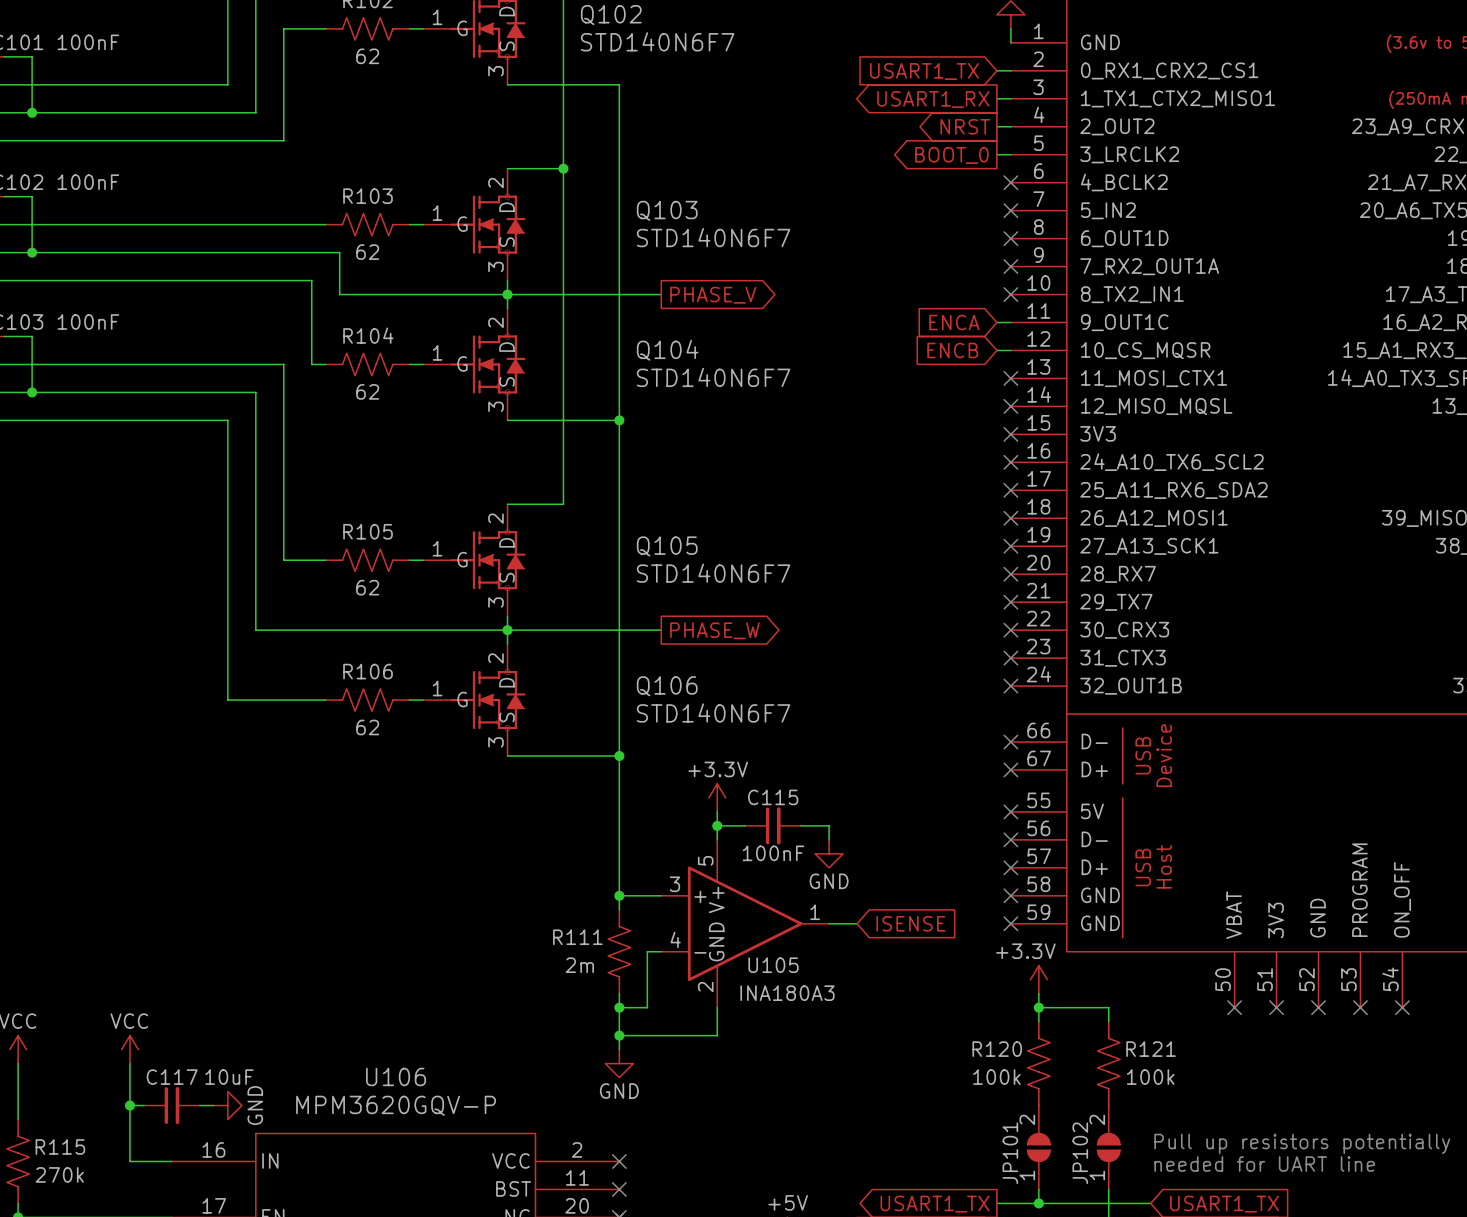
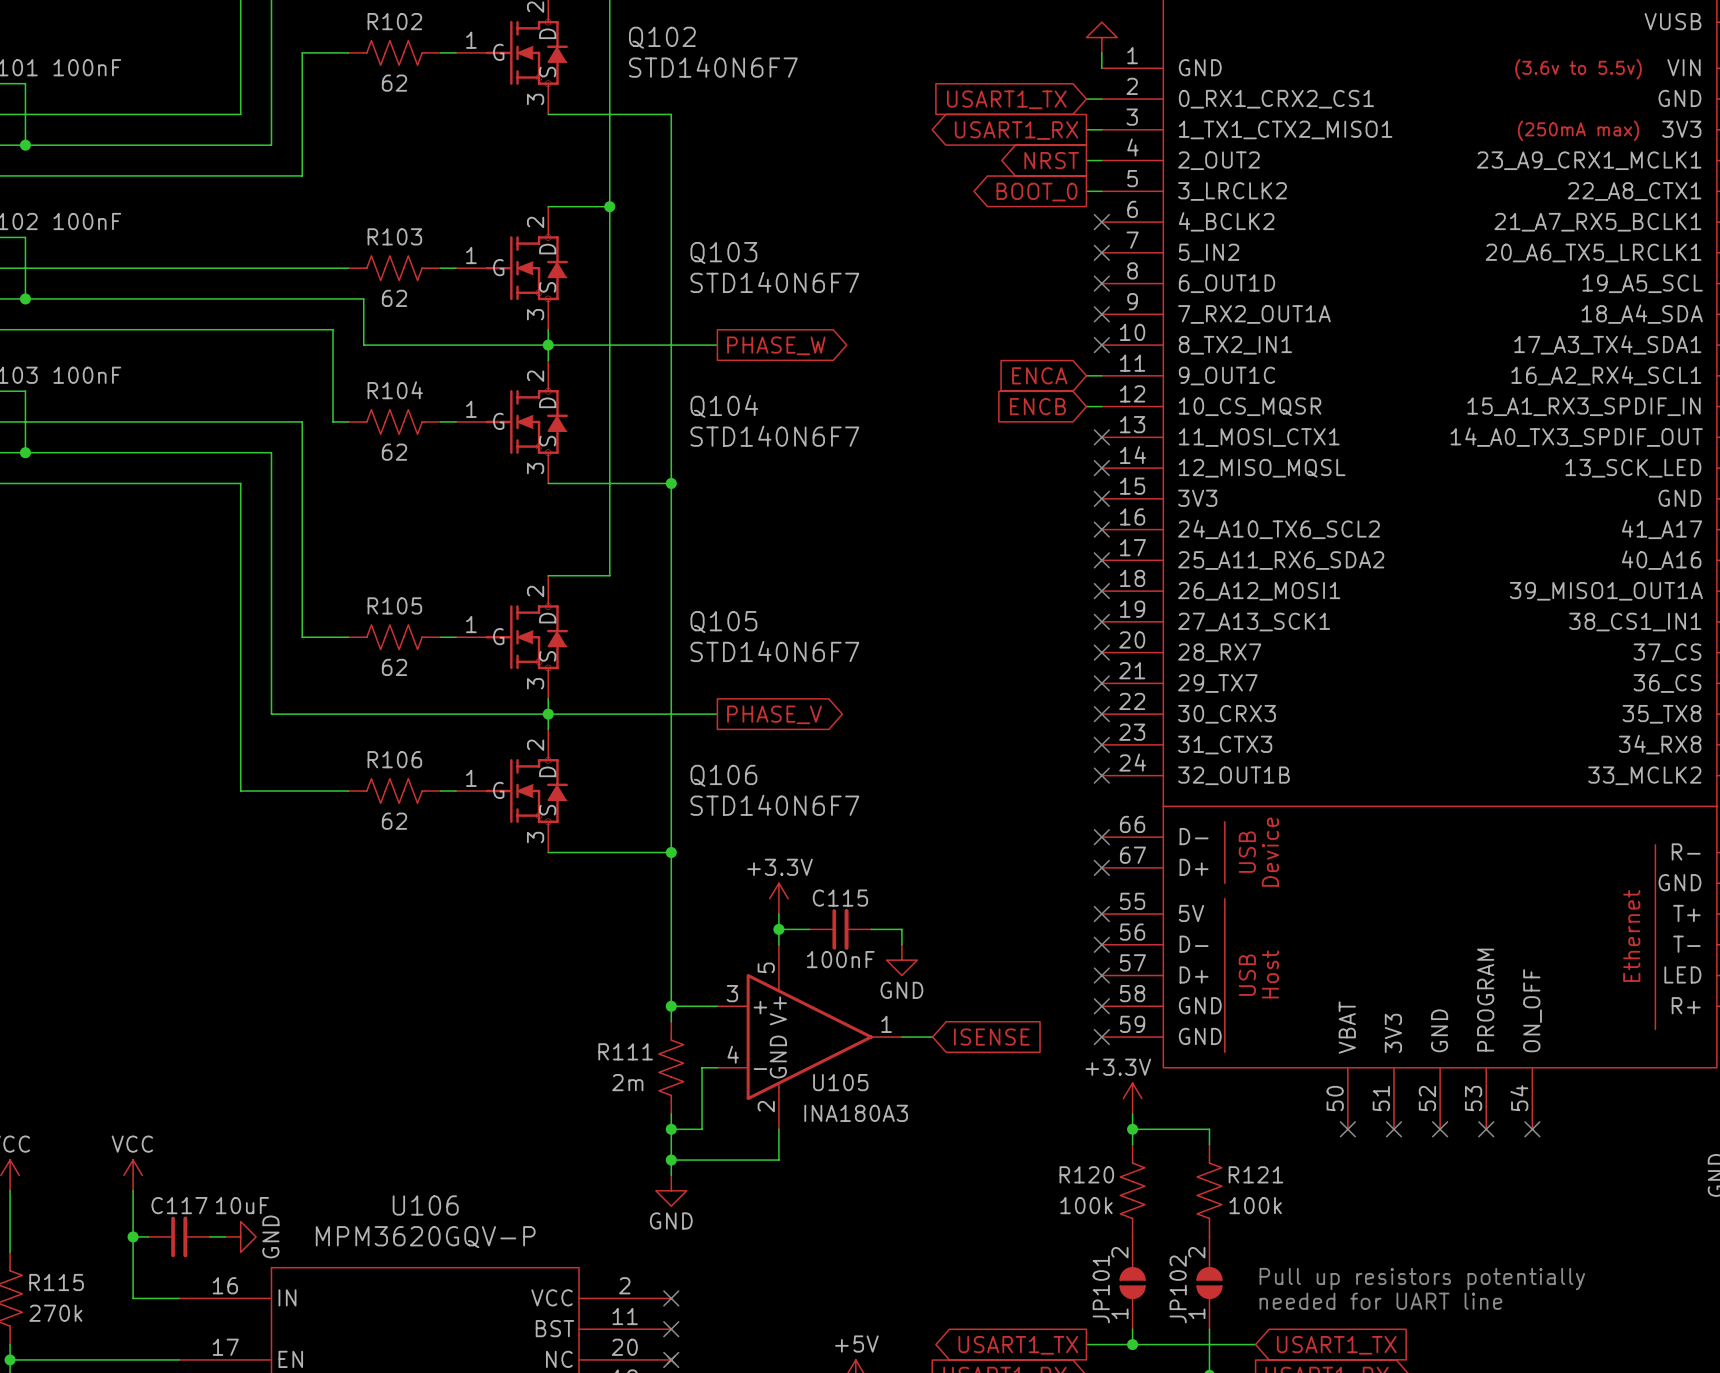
global label: PHASE_V (713, 295) -> PHASE_W (776, 345)
global label: PHASE_W (714, 630) -> PHASE_V (774, 714)

